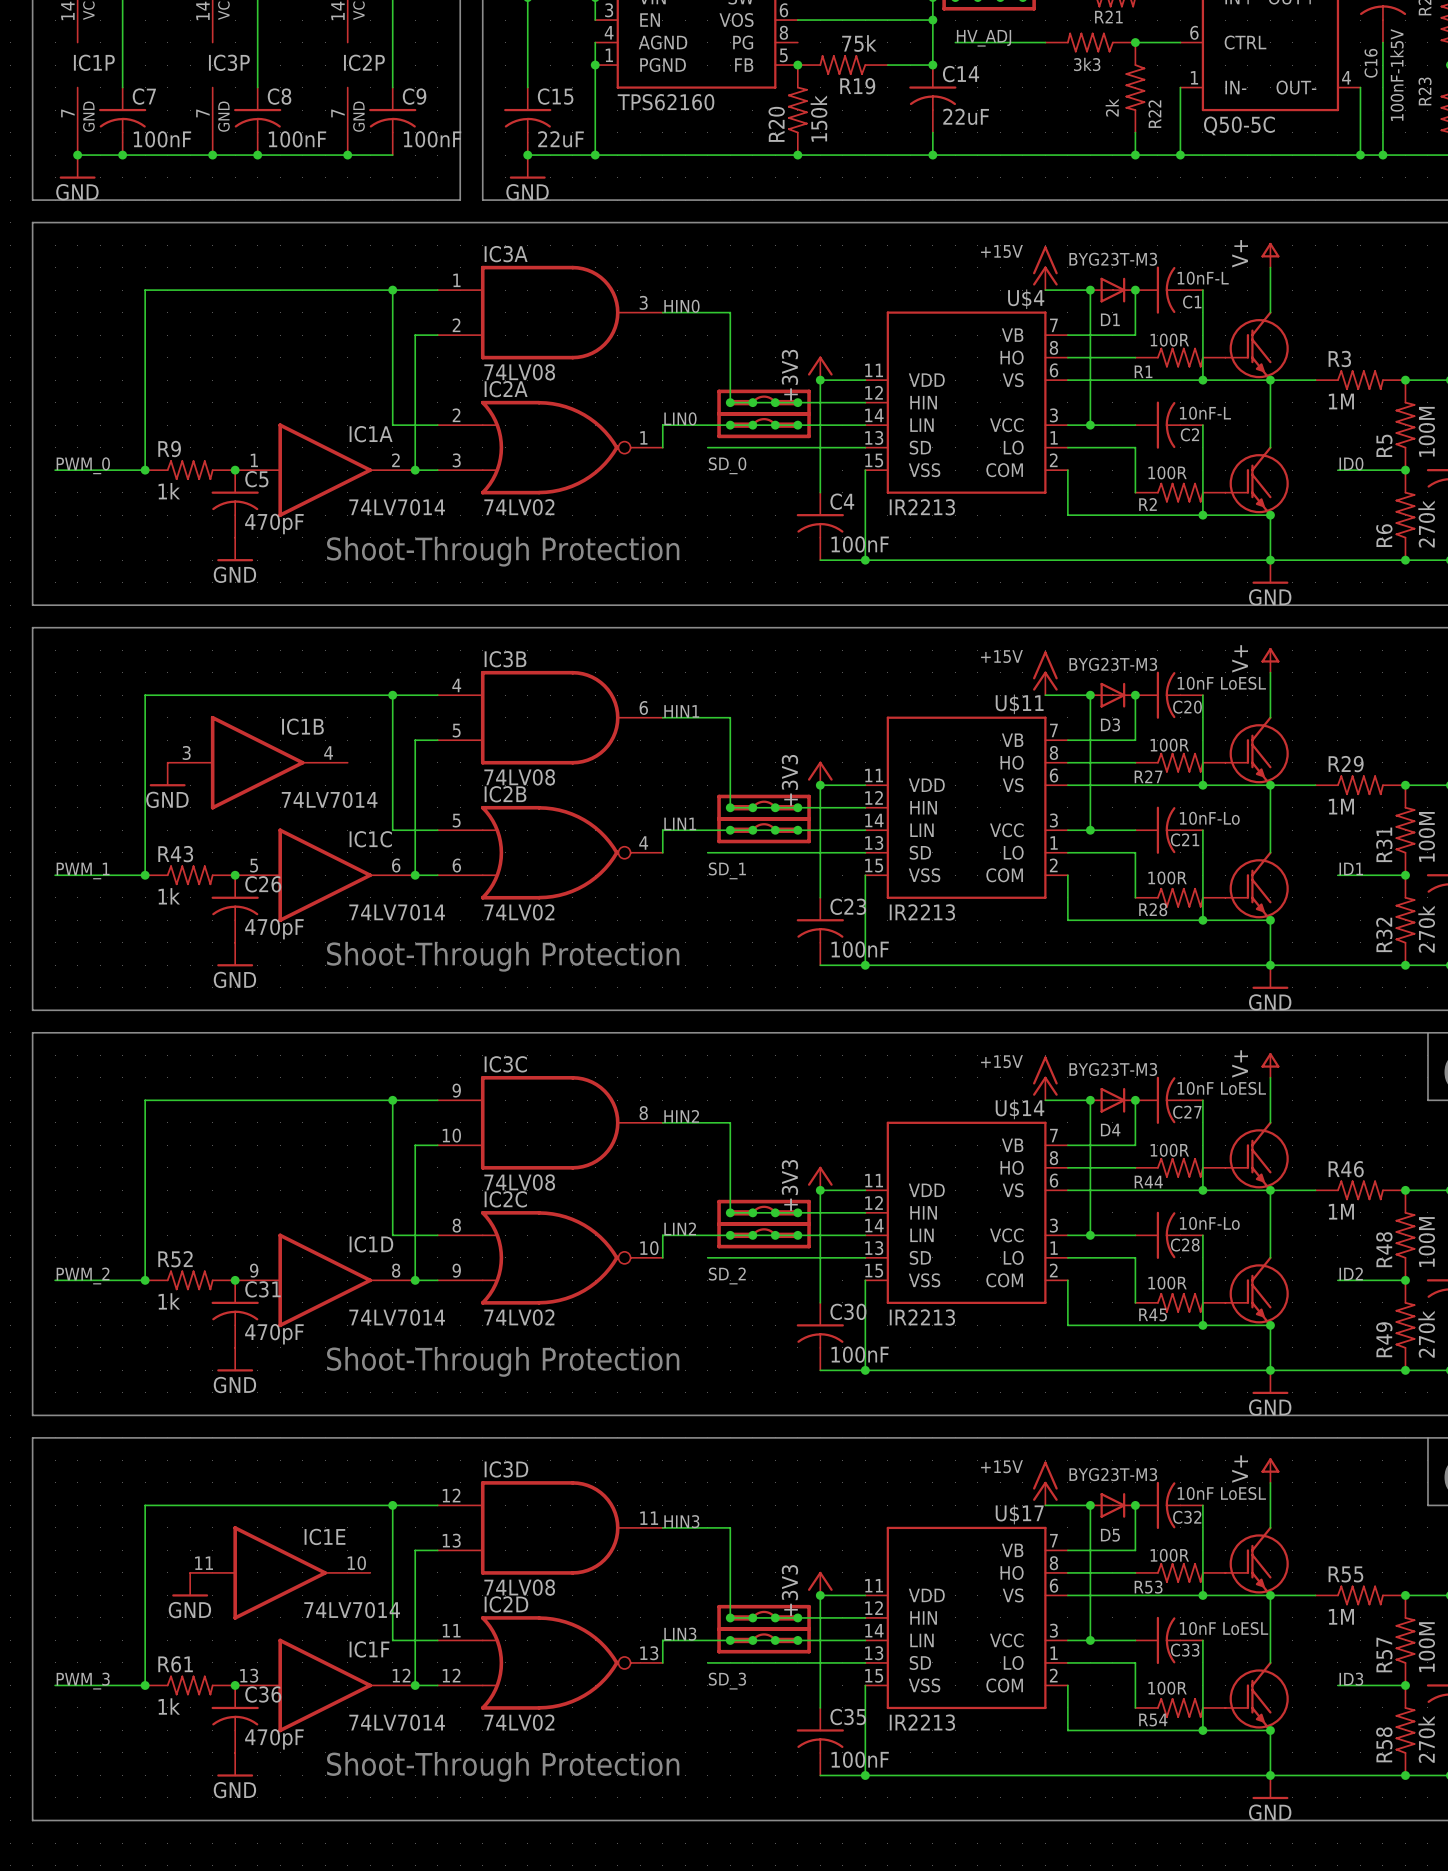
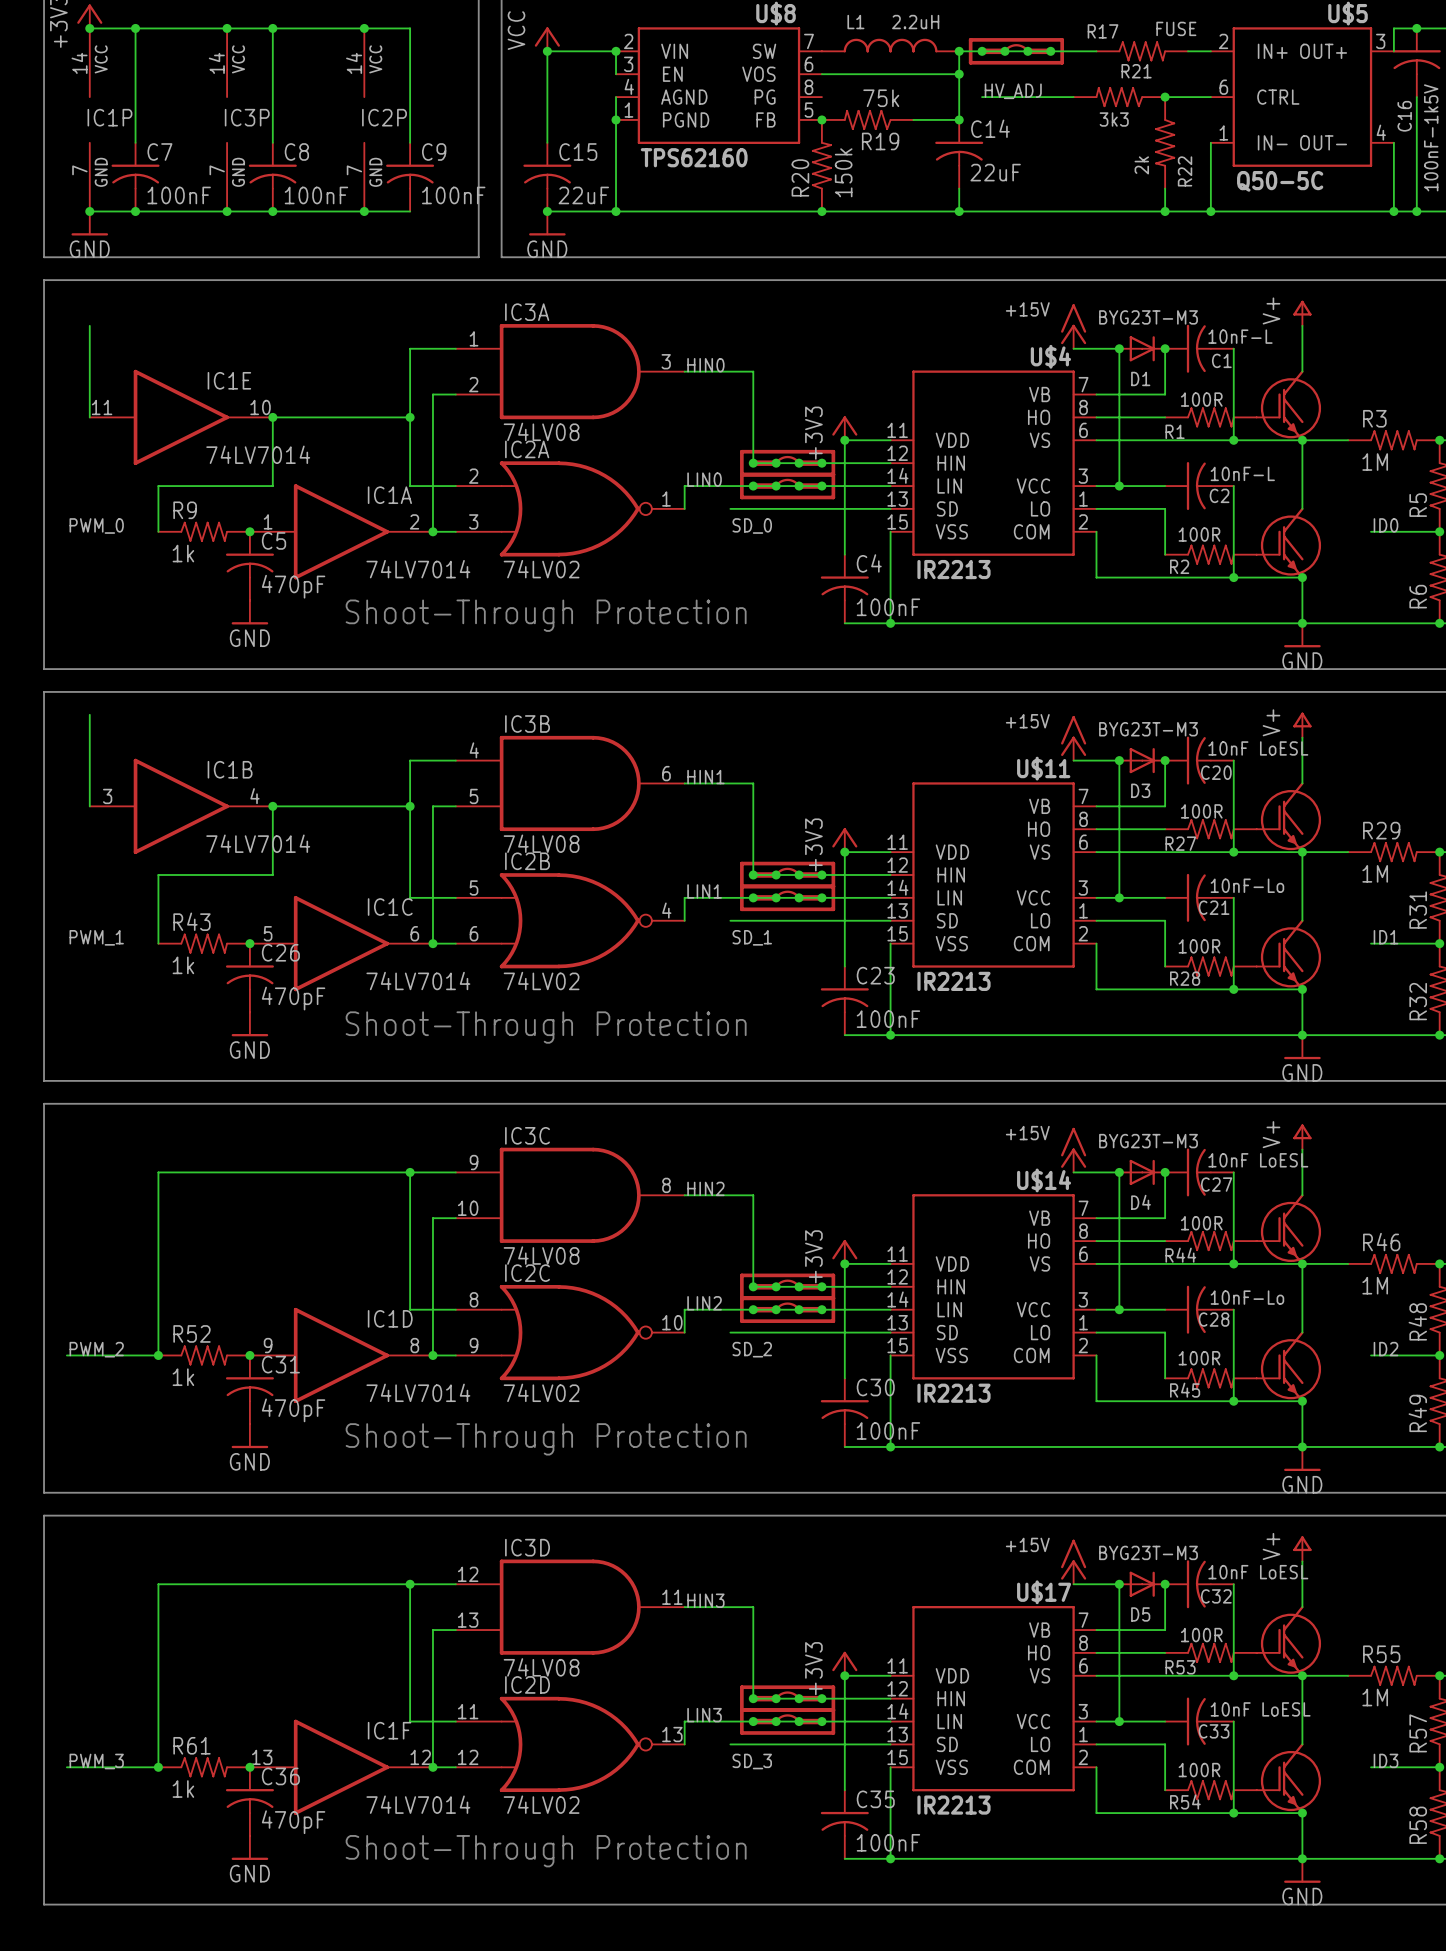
wire: none -> (89, 325) (89, 417)
wire: (392, 290) (145, 290) (145, 425) -> (410, 417) (272, 417) (272, 486) (158, 486)
junction: (392, 290) -> none
junction: none -> (272, 417)
junction: none -> (410, 417)
wire: (55, 470) (145, 470) -> none
junction: (145, 470) -> none
wire: none -> (89, 714) (89, 806)
wire: (392, 695) (145, 695) (145, 807) -> (410, 806) (272, 806) (272, 874) (158, 874)
junction position: (392, 695) -> (410, 806)
junction: none -> (272, 806)
IC1B position: (257, 762) -> (181, 806)
power symbol: GND (167, 774) -> none
wire: (55, 875) (145, 875) -> none
junction: (145, 875) -> none
IC1E position: (280, 1572) -> (181, 417)
power symbol: GND (190, 1584) -> none

